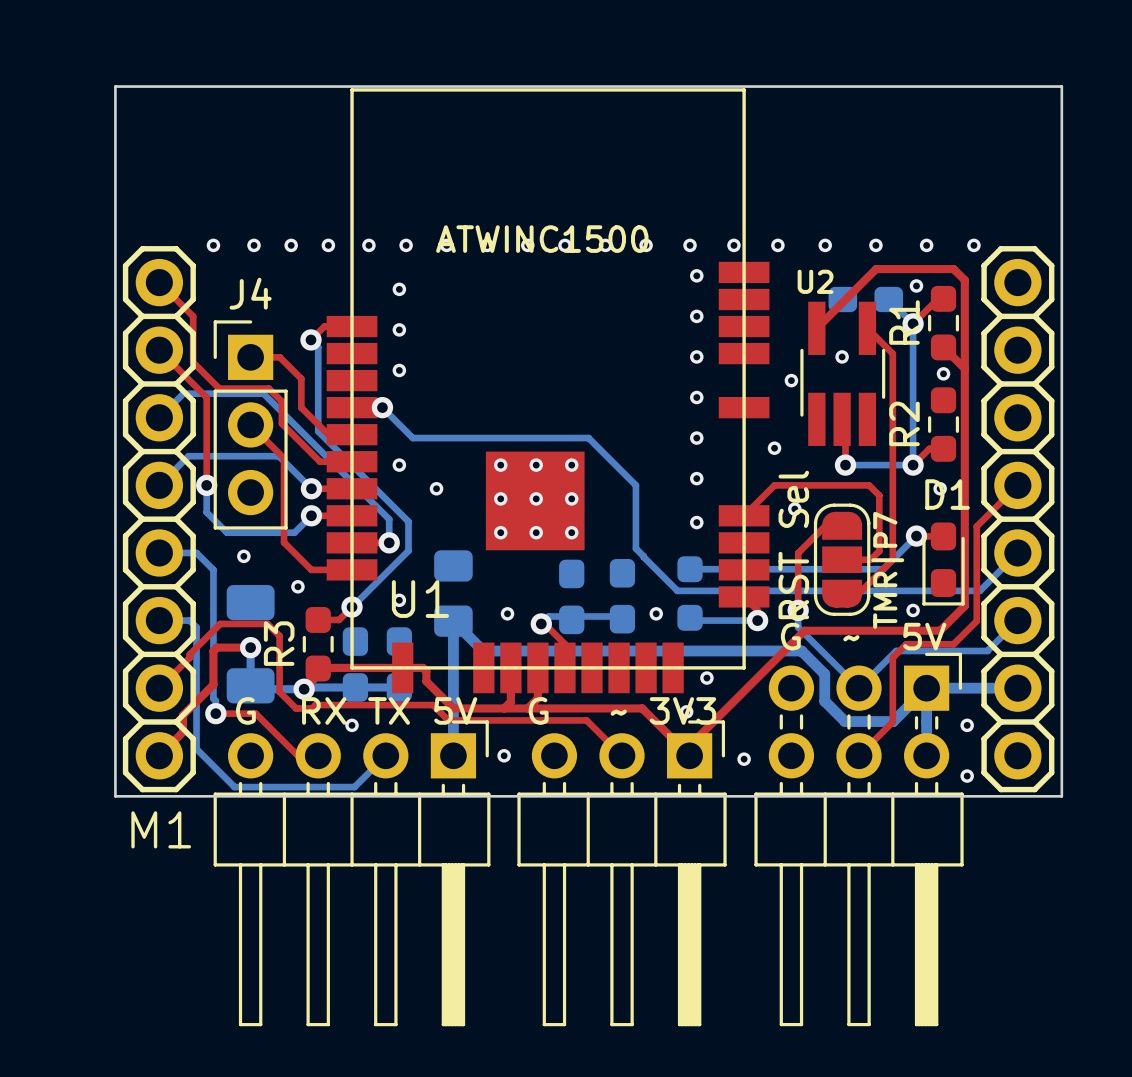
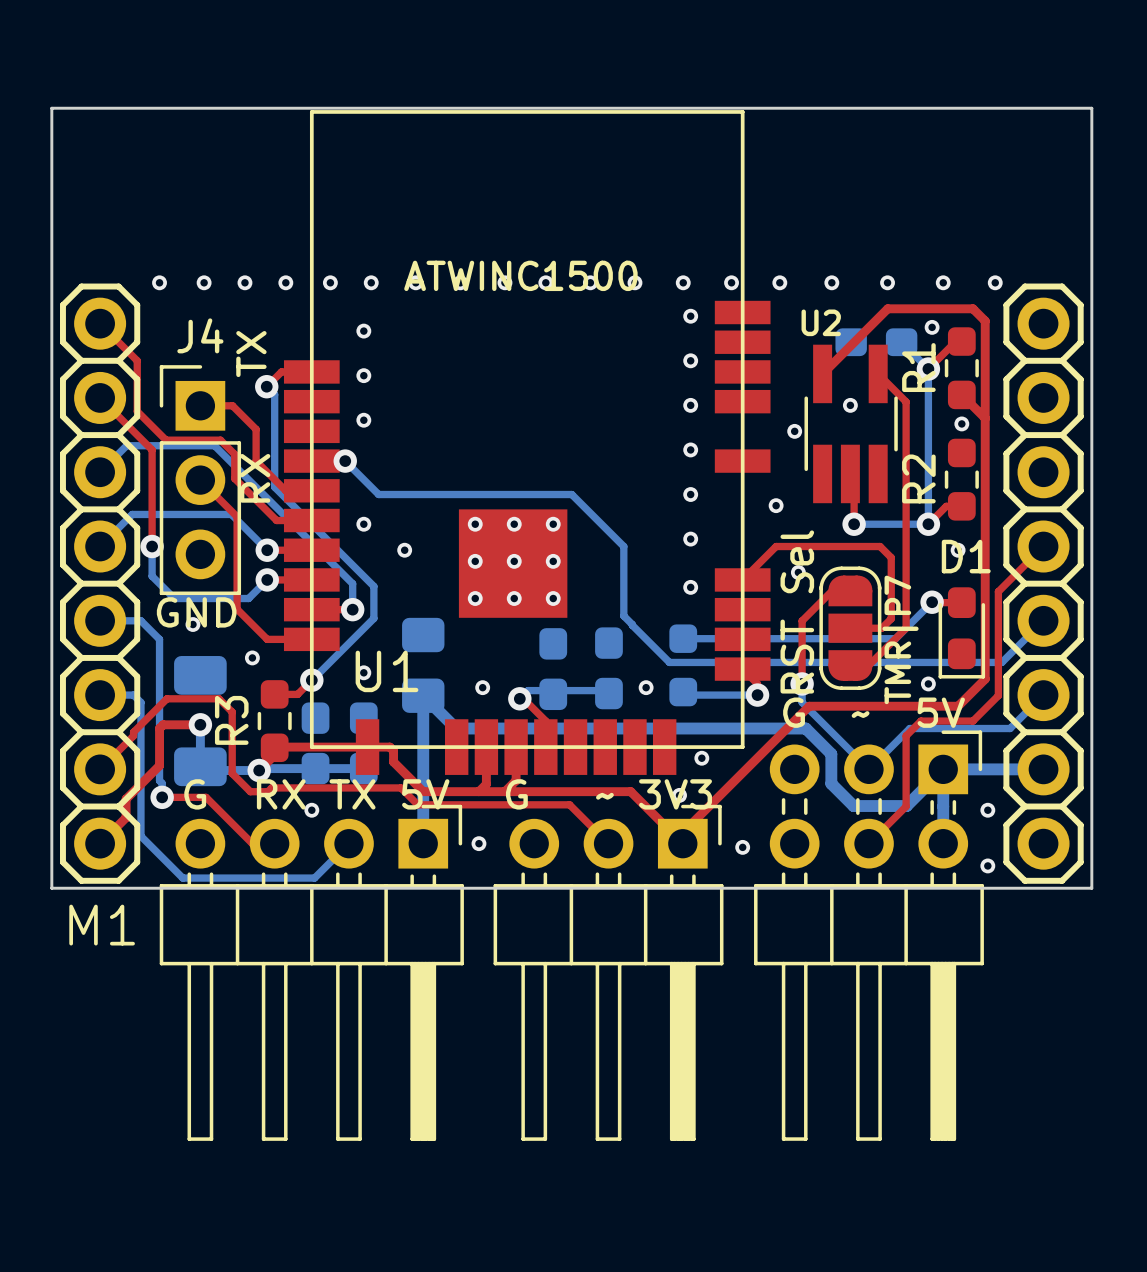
text: none -> TX (251, 354)
text: none -> RX (255, 478)
text: none -> GND (196, 612)

